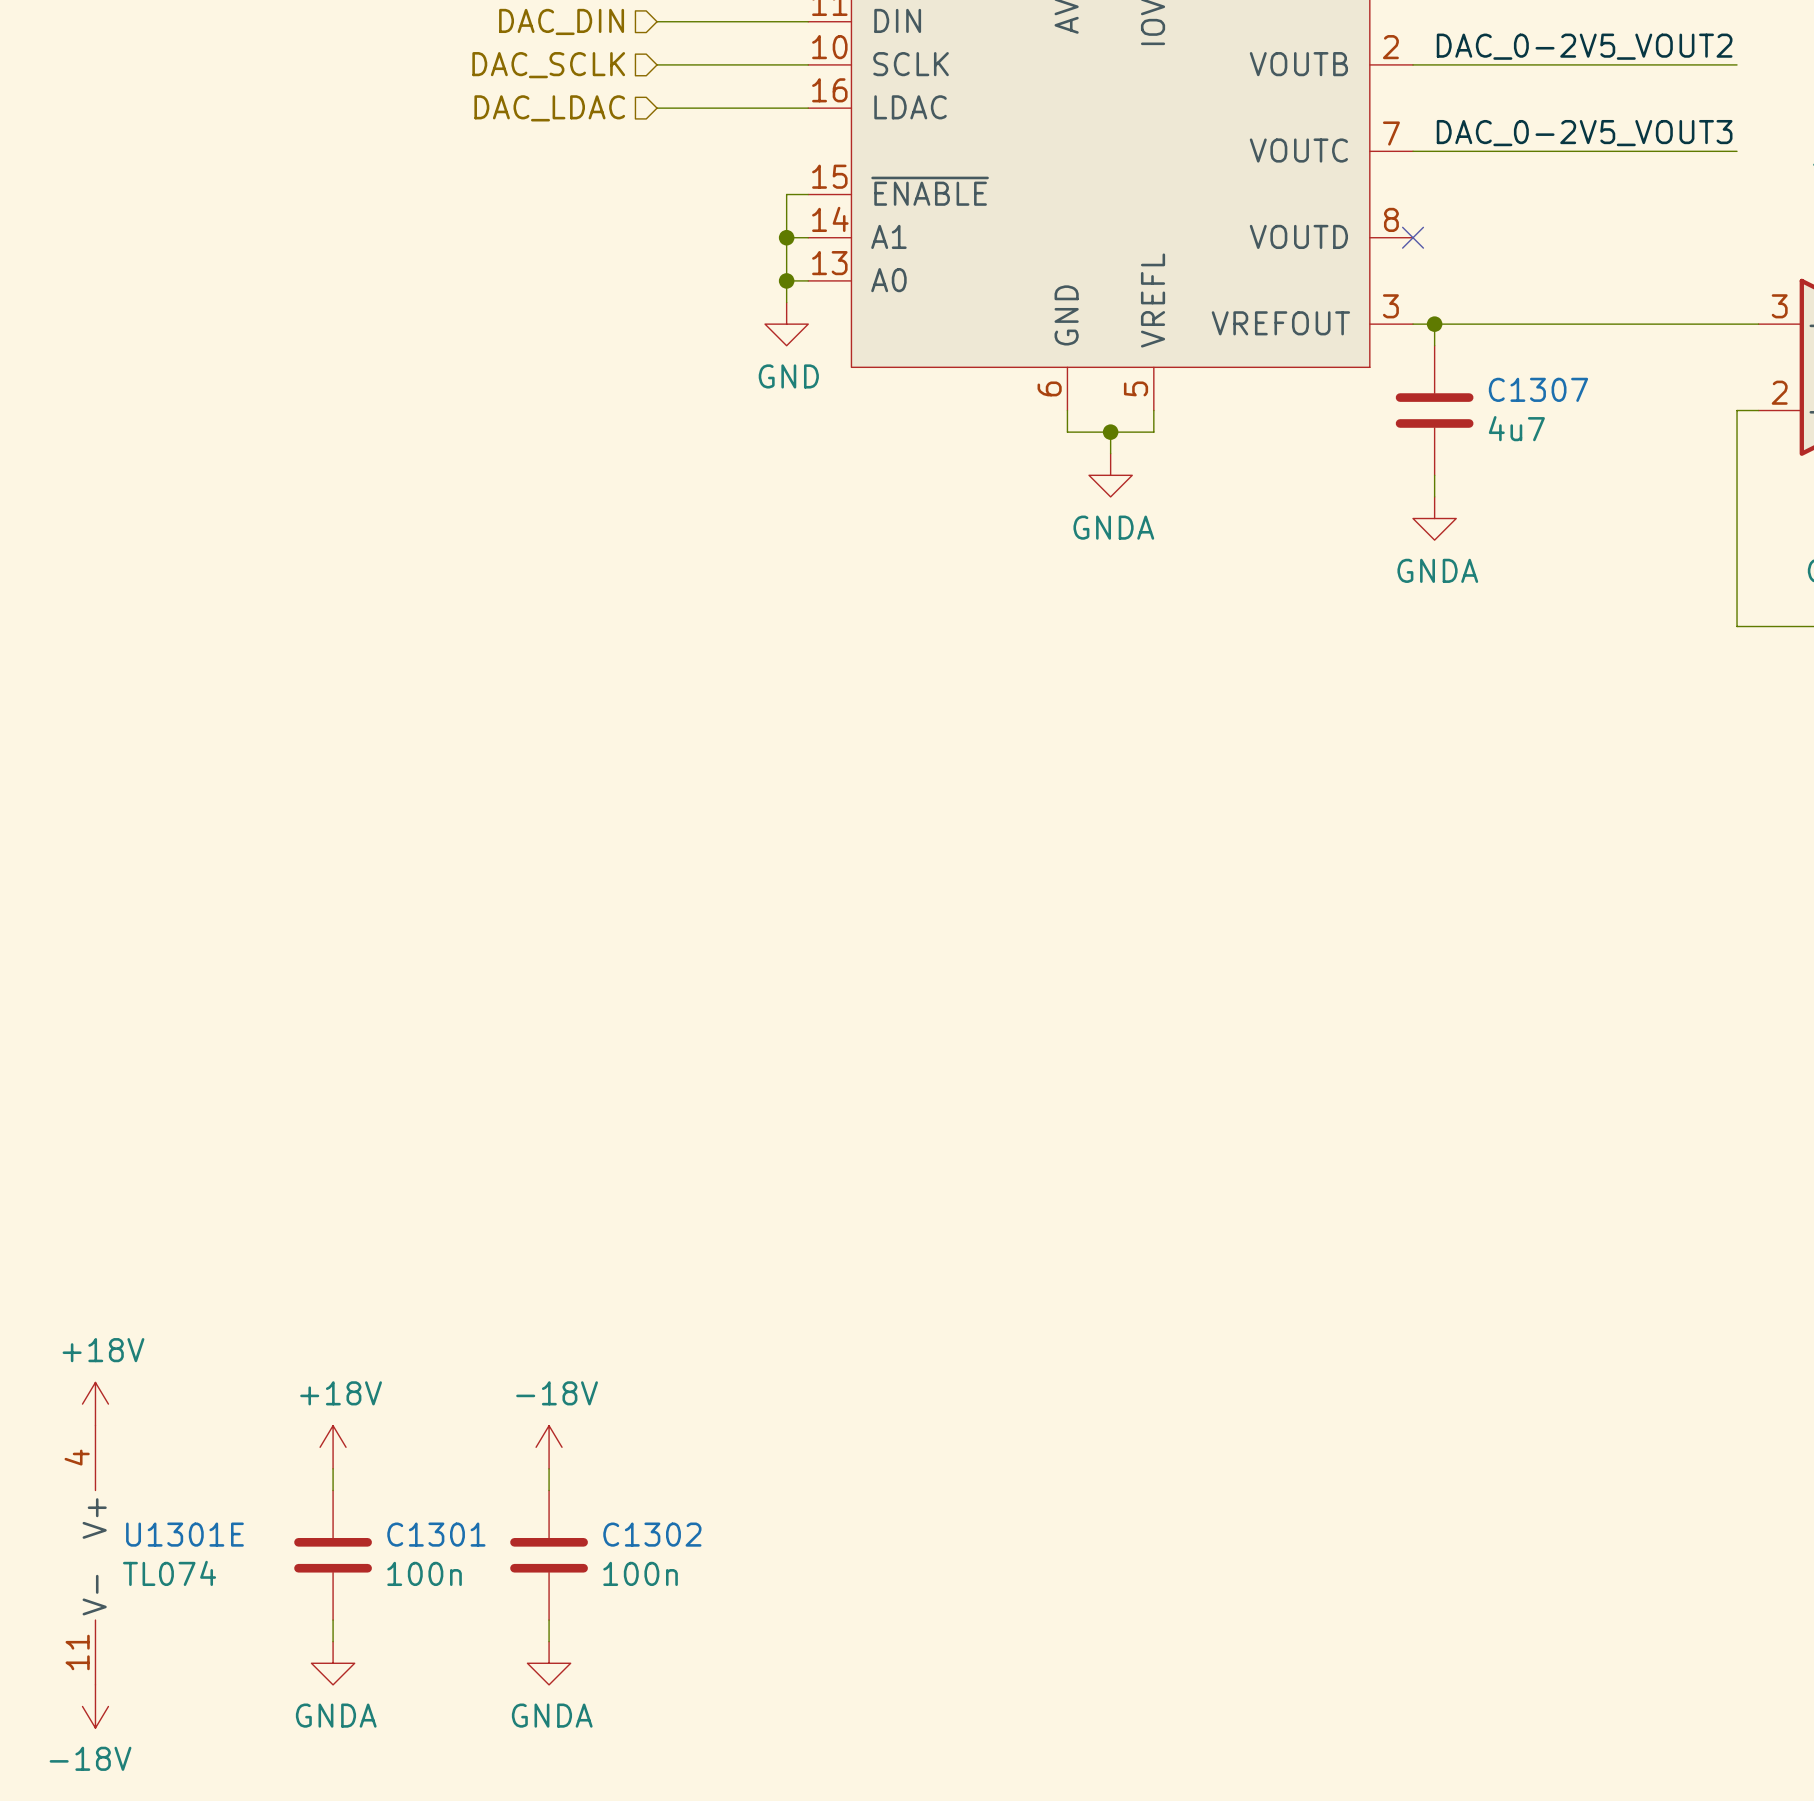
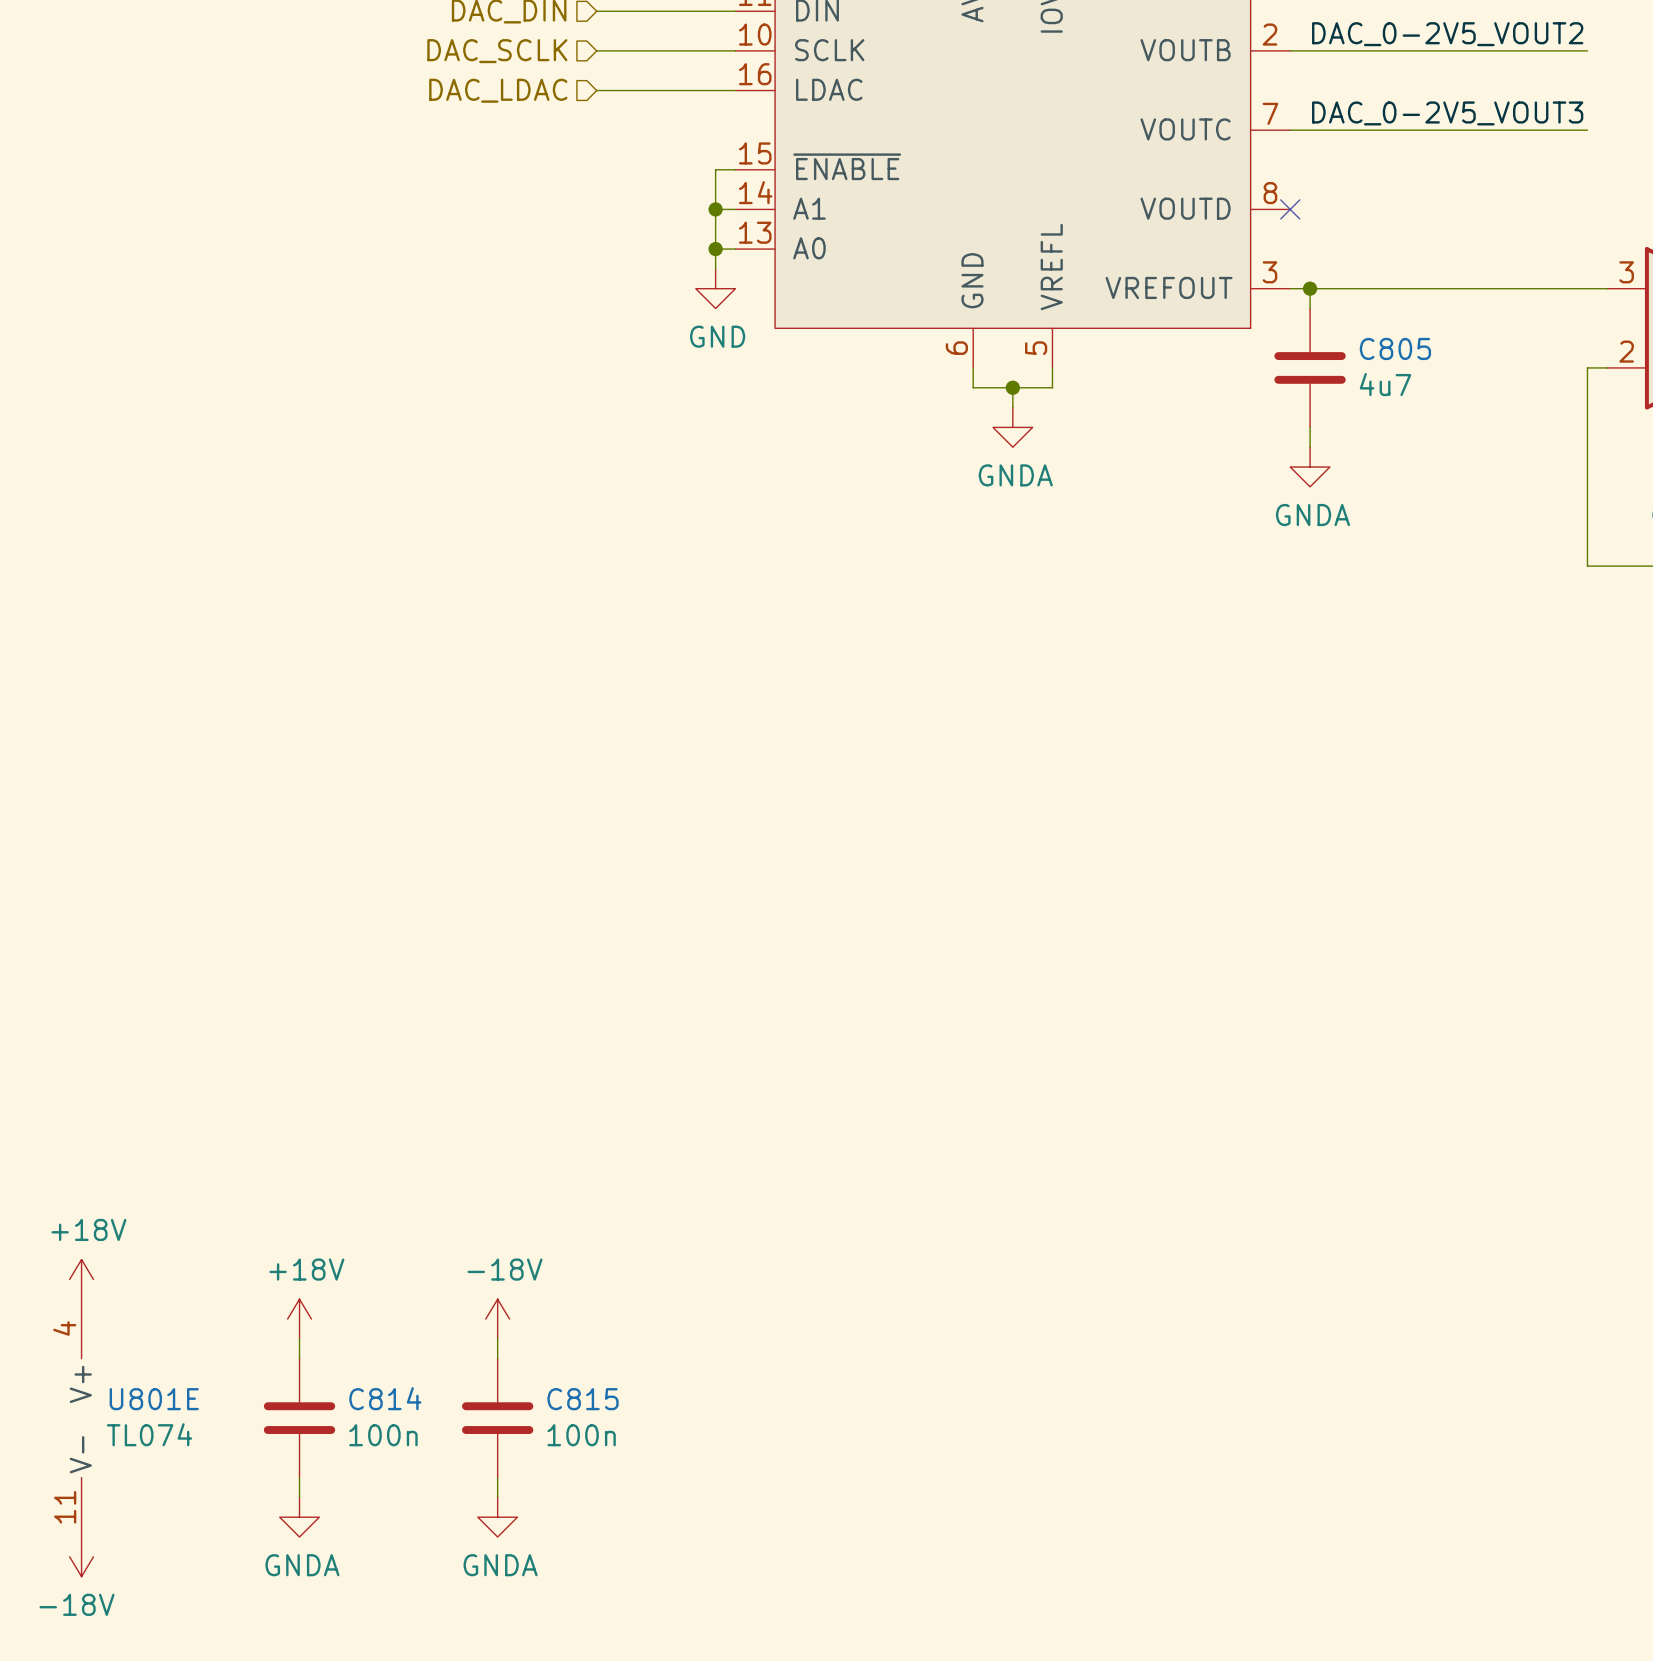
C1307 name: C1307 (1538, 389) -> C805 (1395, 348)
U1301E name: U1301E (184, 1534) -> U801E (154, 1399)
C1301 name: C1301 (436, 1534) -> C814 (385, 1398)
C1302 name: C1302 (652, 1534) -> C815 (583, 1399)

